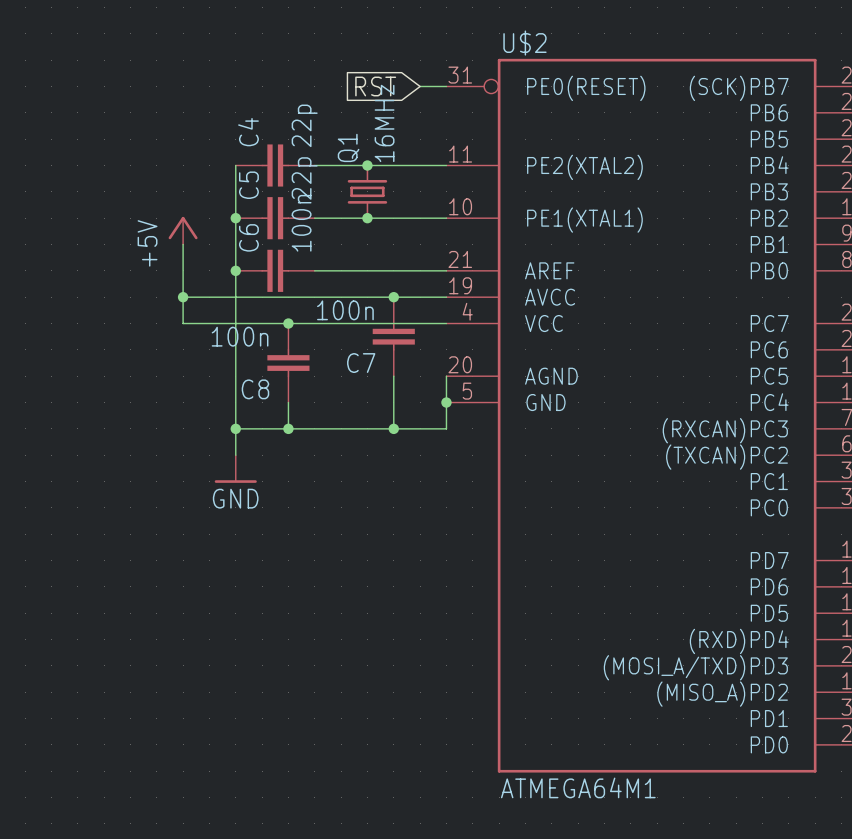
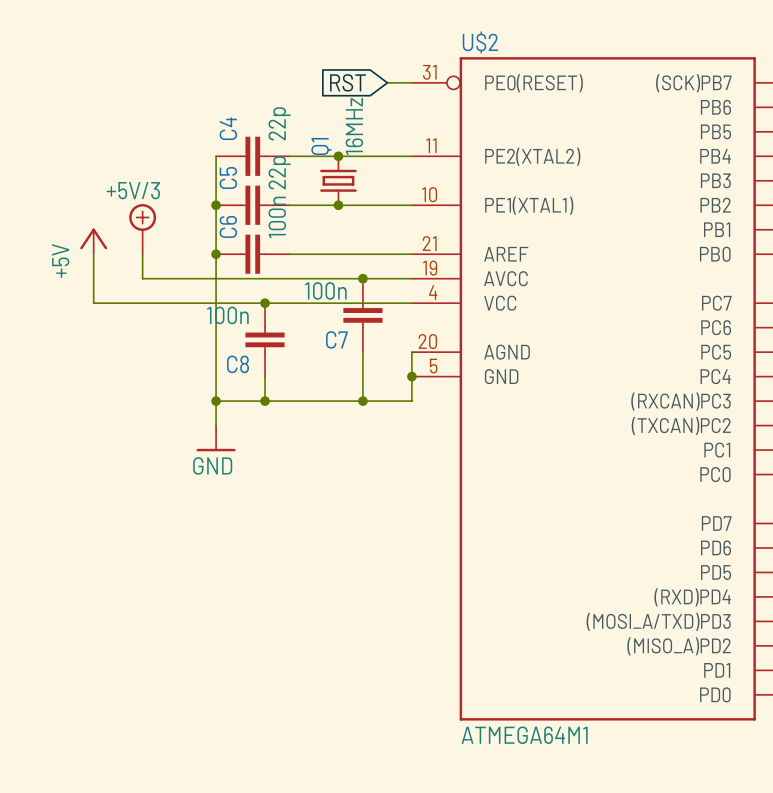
power symbol position: +5V (183, 230) -> +5V (93, 241)
power symbol: none -> +5V/3 (142, 229)
wire: (183, 244) (183, 323) -> (93, 254) (93, 303) (167, 303)
wire: none -> (142, 254) (142, 278) (167, 278)
junction: (183, 297) -> none

